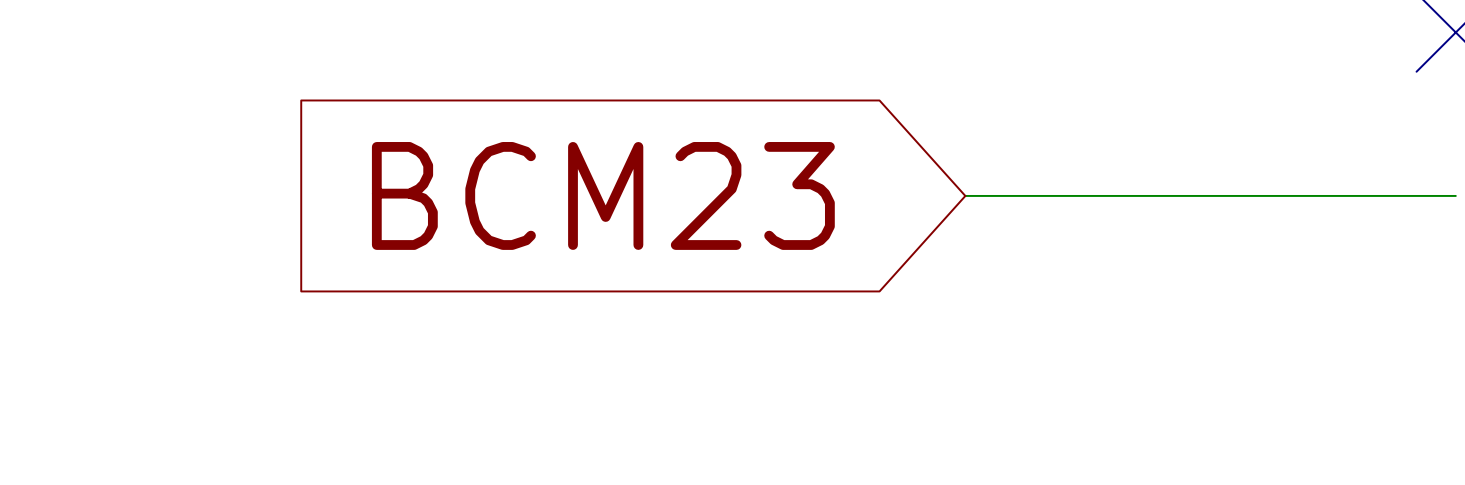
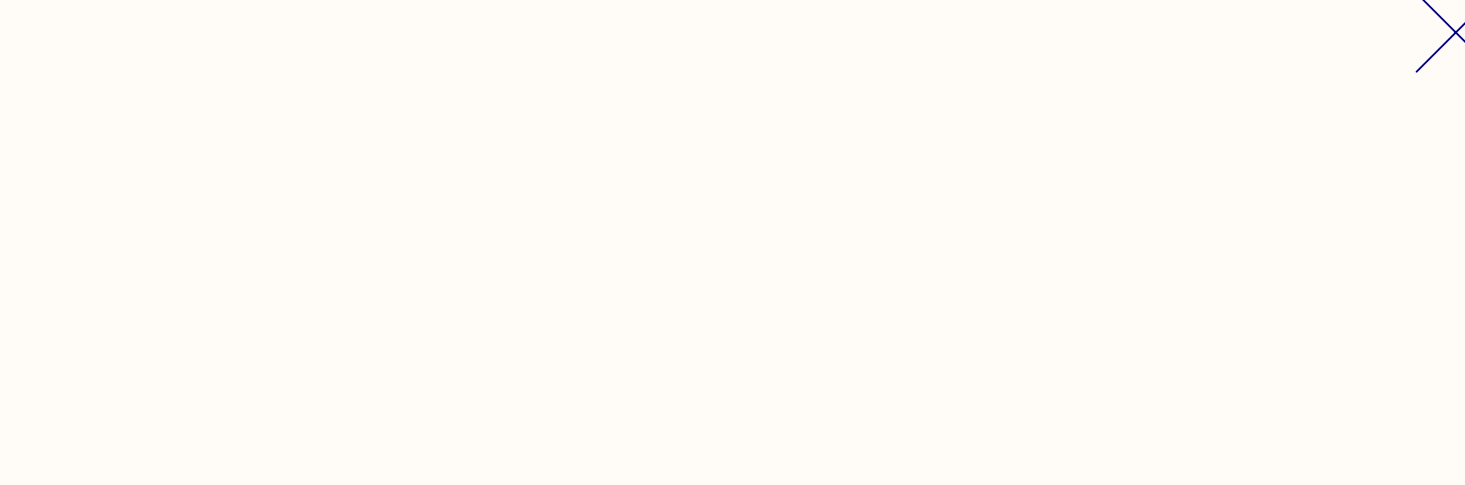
global label: BCM23 (603, 195) -> none
wire: (965, 195) (1455, 195) -> none

